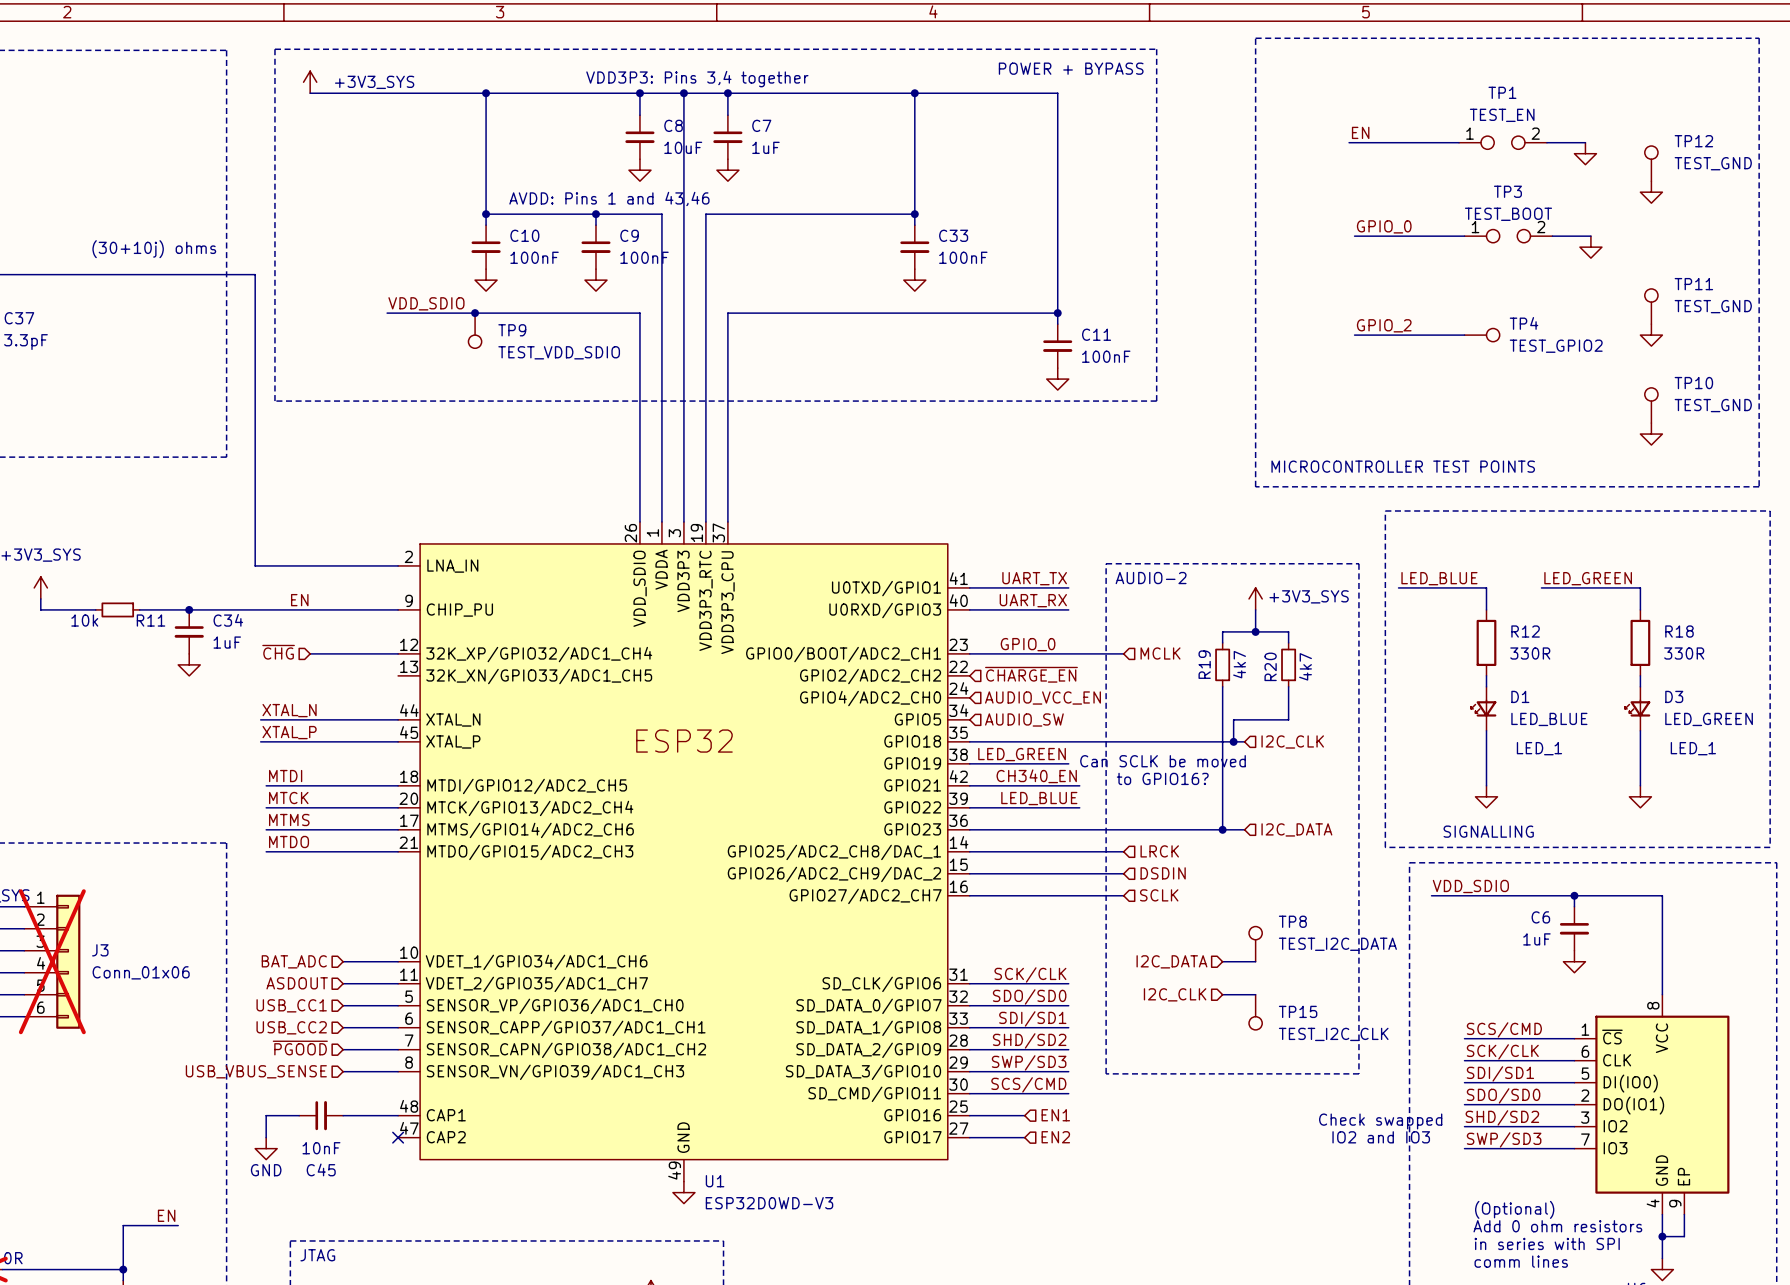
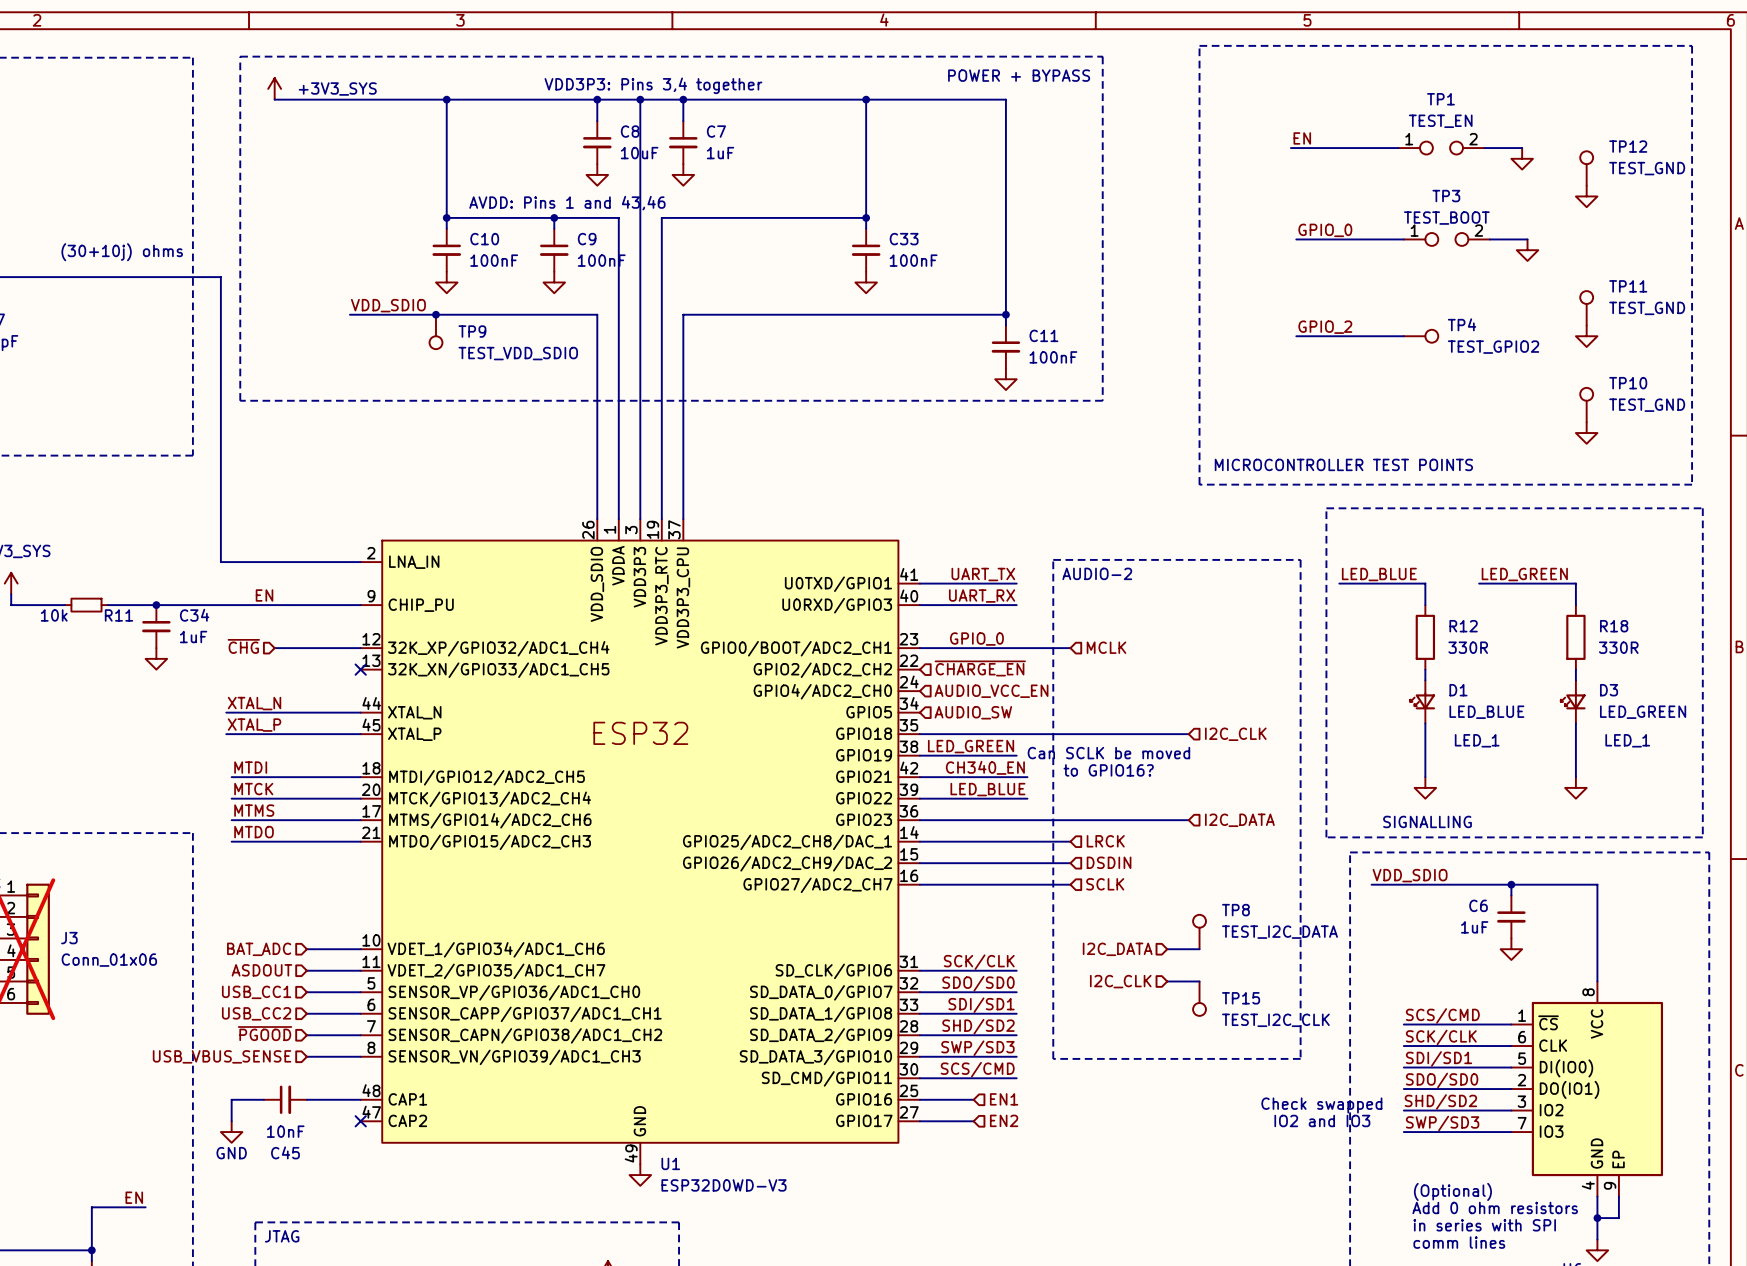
power symbol: +3V3_SYS (1255, 598) -> none
wire: (1255, 609) (1255, 631) -> none
junction: (1255, 631) -> none
wire: (1222, 642) (1222, 631) (1288, 631) (1288, 642) -> none
R19: 4k7 (1222, 664) -> none
R20: 4k7 (1288, 664) -> none
no-connect mark: none -> (360, 669)
wire: (1222, 686) (1222, 829) -> none
wire: (1288, 686) (1288, 719) (1233, 719) (1233, 741) -> none
junction: (1233, 741) -> none
junction: (1222, 829) -> none

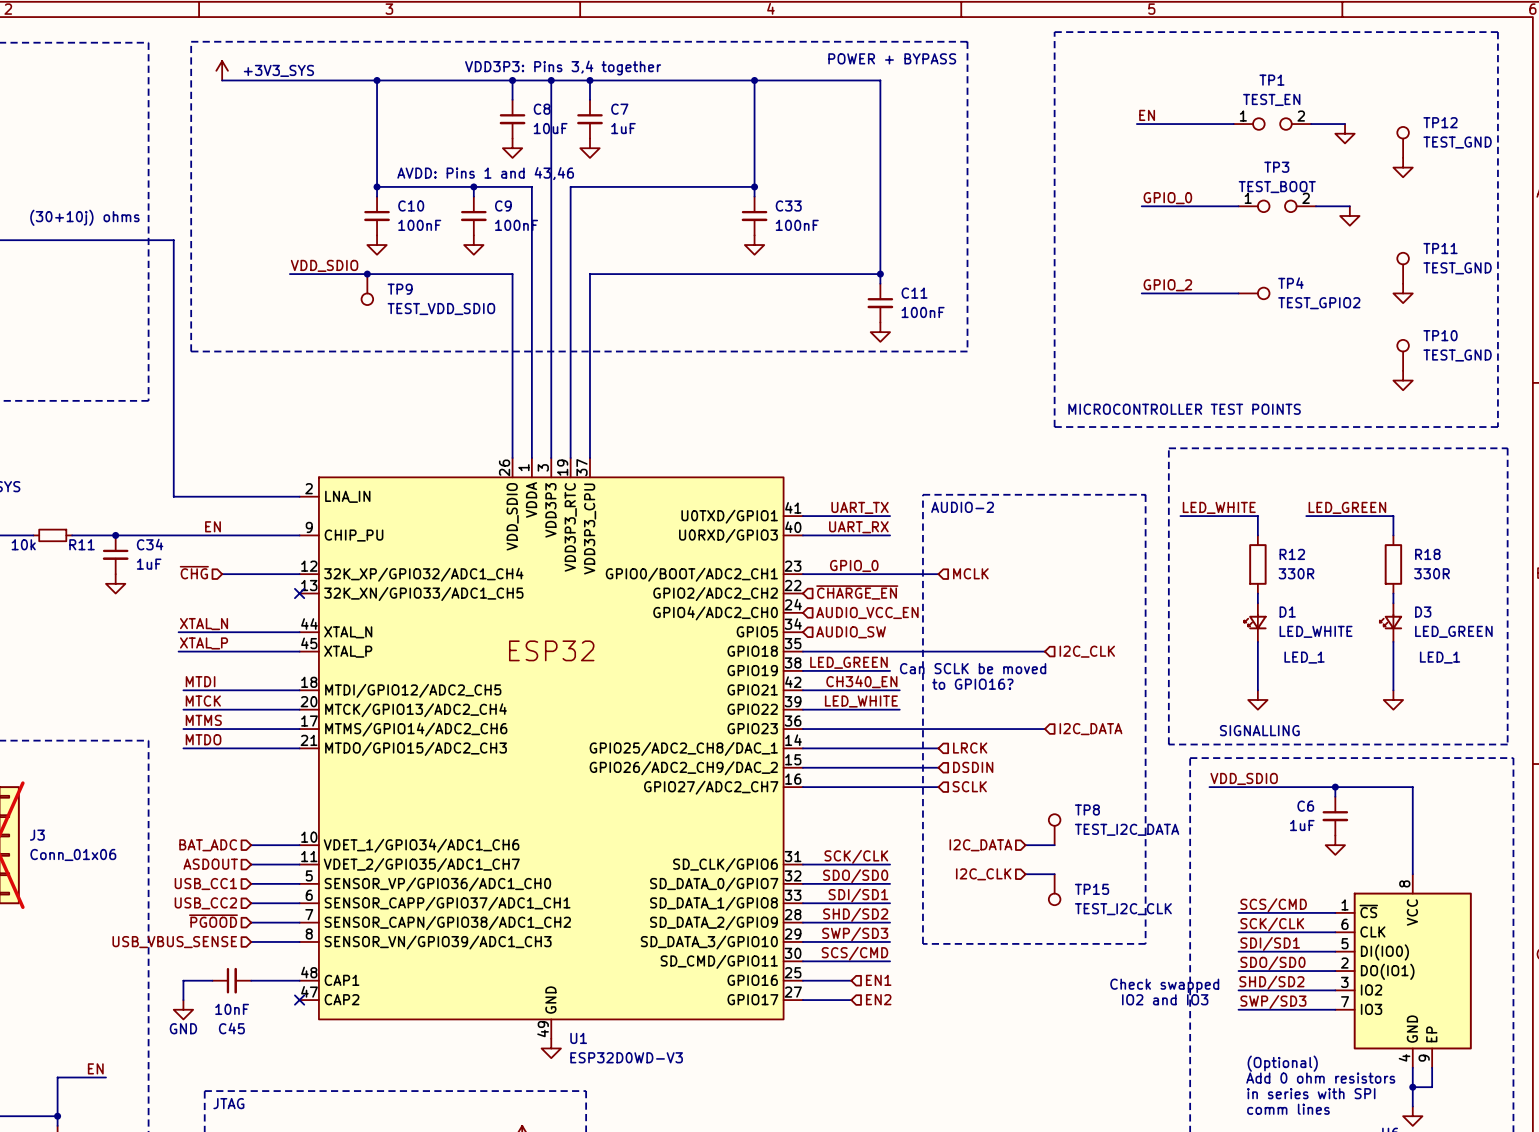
label: LED_BLUE (1379, 574) -> LED_WHITE (1219, 507)
D1 value: LED_BLUE (1486, 712) -> LED_WHITE (1316, 631)
label: LED_BLUE (987, 789) -> LED_WHITE (861, 701)

